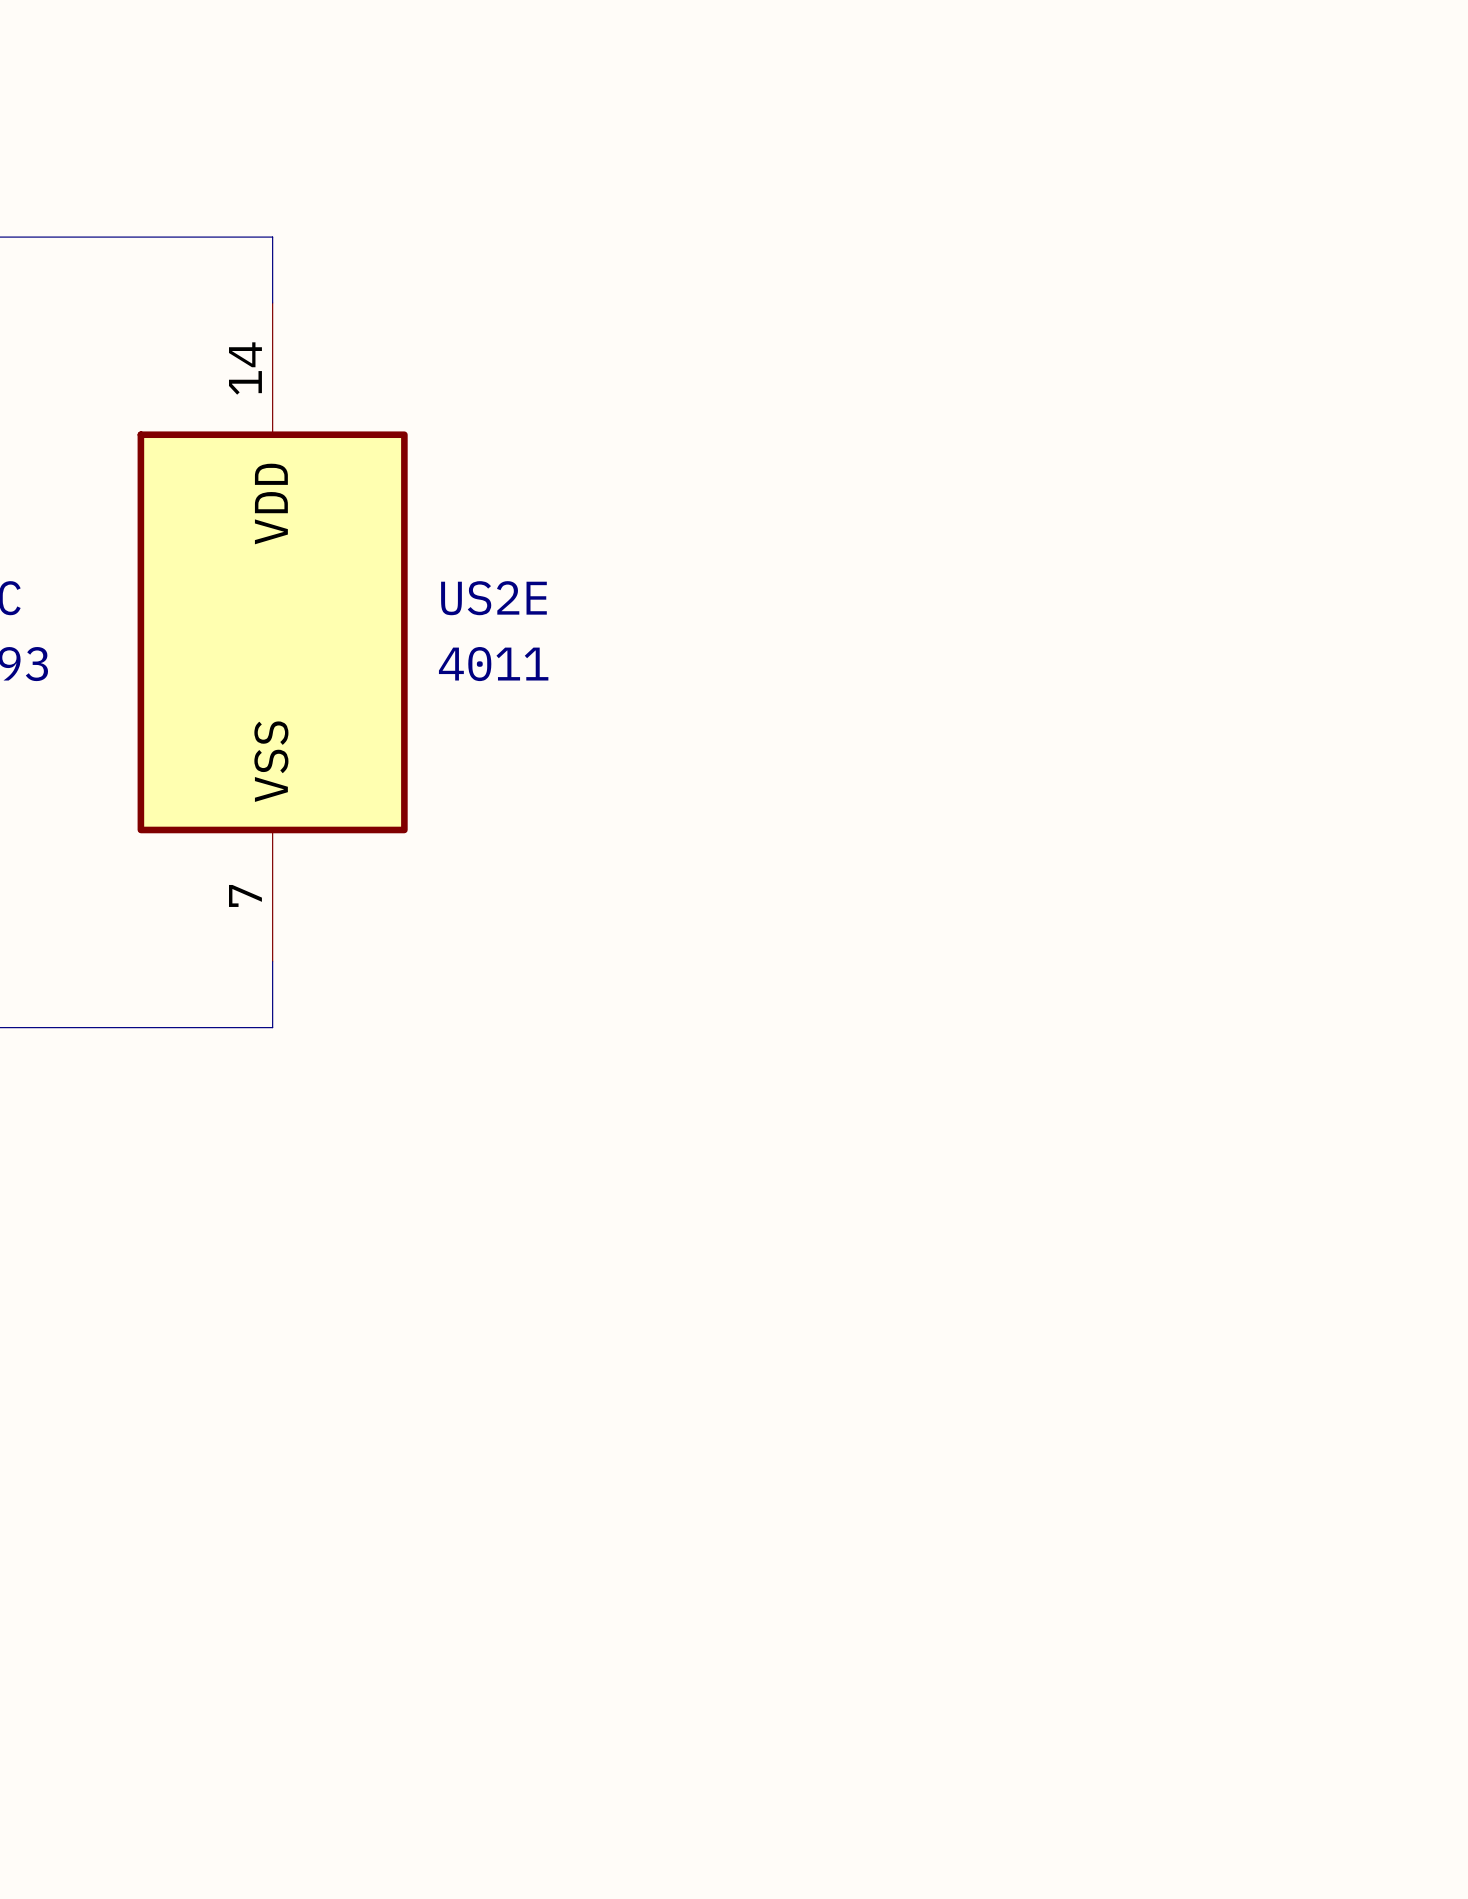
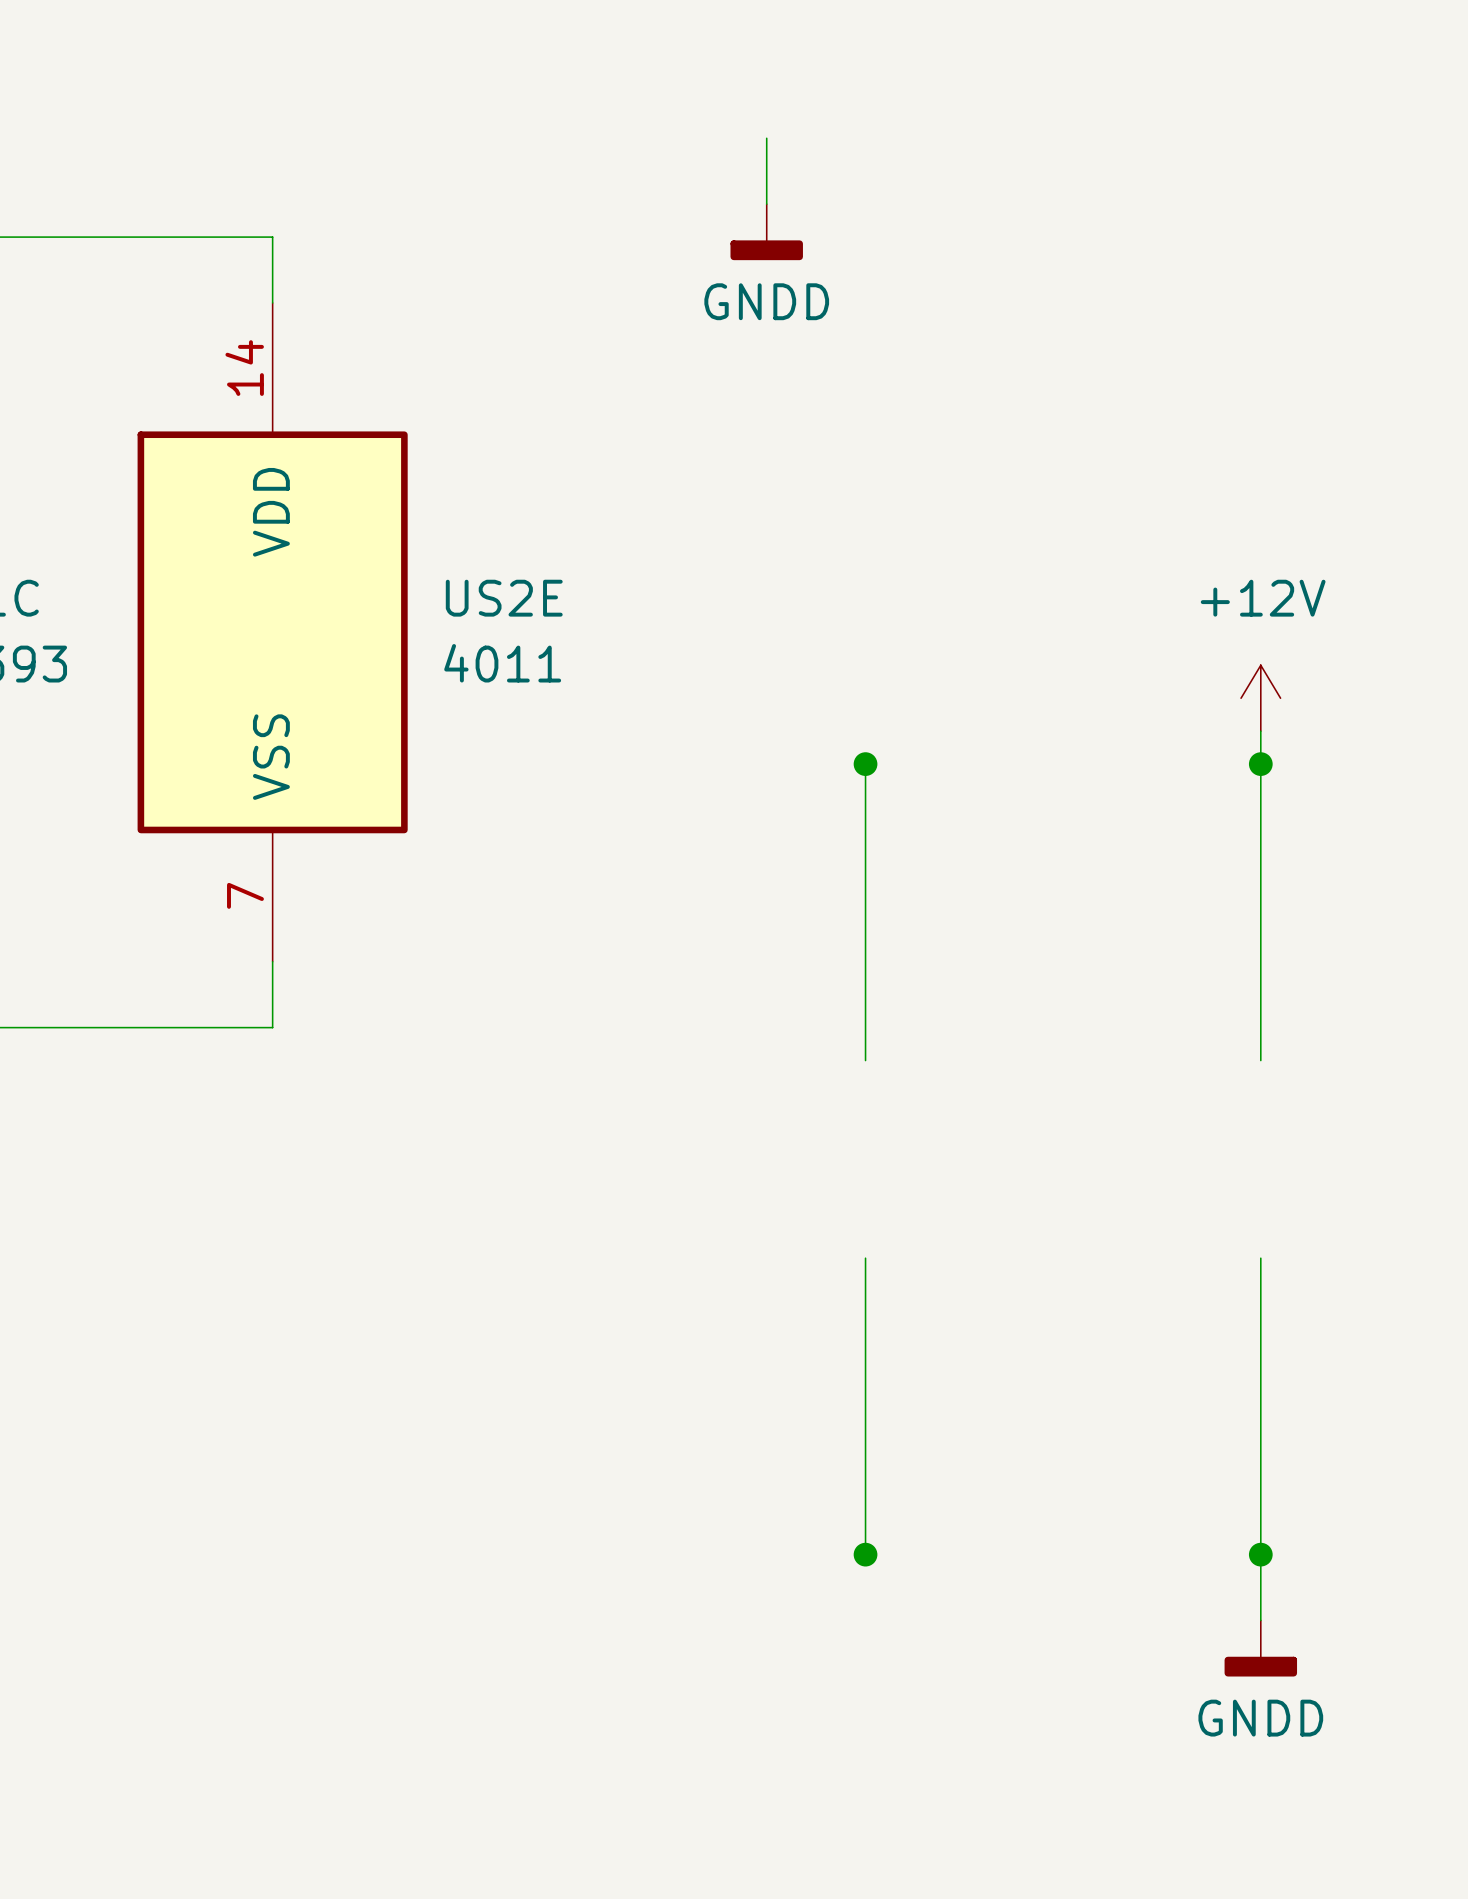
wire: none -> (766, 138) (766, 204)
power symbol: none -> GNDD (766, 232)
power symbol: none -> +12V (1260, 698)
wire: none -> (1260, 731) (1260, 1060)
wire: none -> (865, 764) (865, 1060)
junction: none -> (865, 764)
junction: none -> (1260, 764)
wire: none -> (865, 1258) (865, 1554)
wire: none -> (1260, 1258) (1260, 1620)
junction: none -> (865, 1554)
junction: none -> (1260, 1554)
power symbol: none -> GNDD (1260, 1648)

